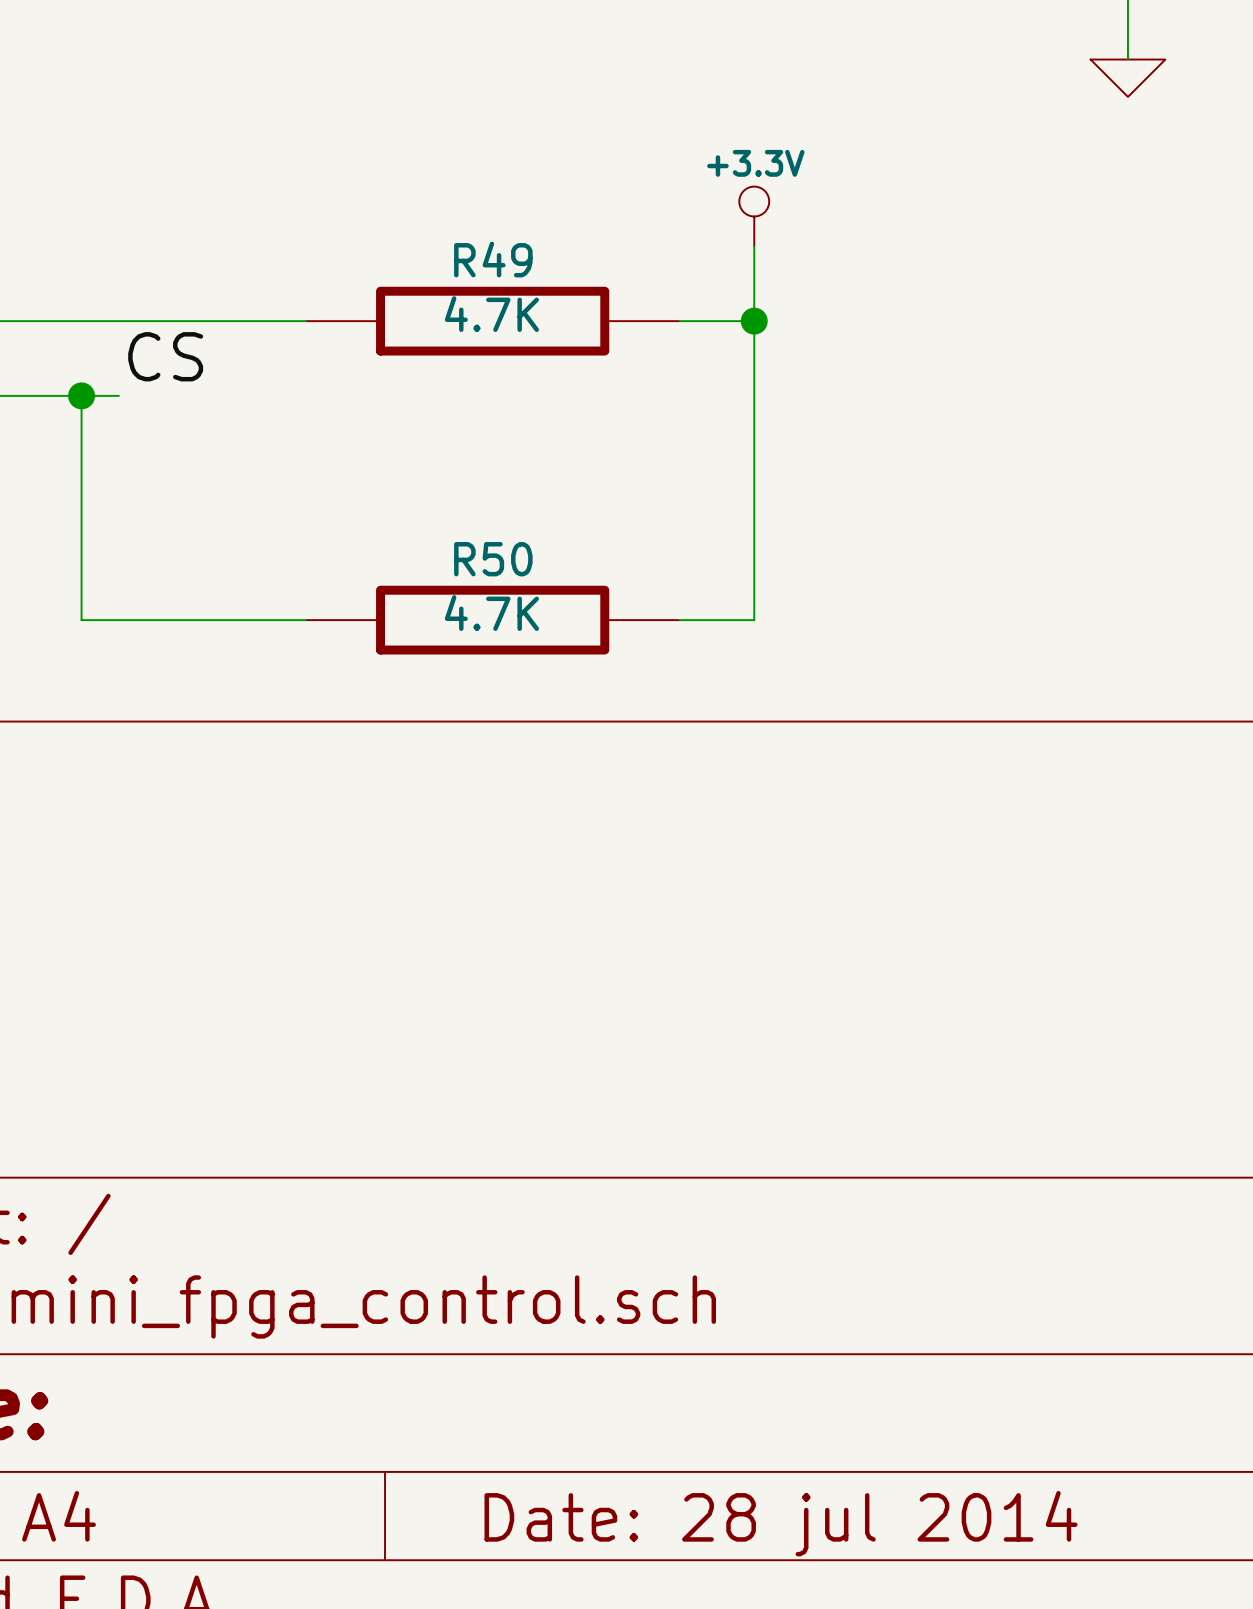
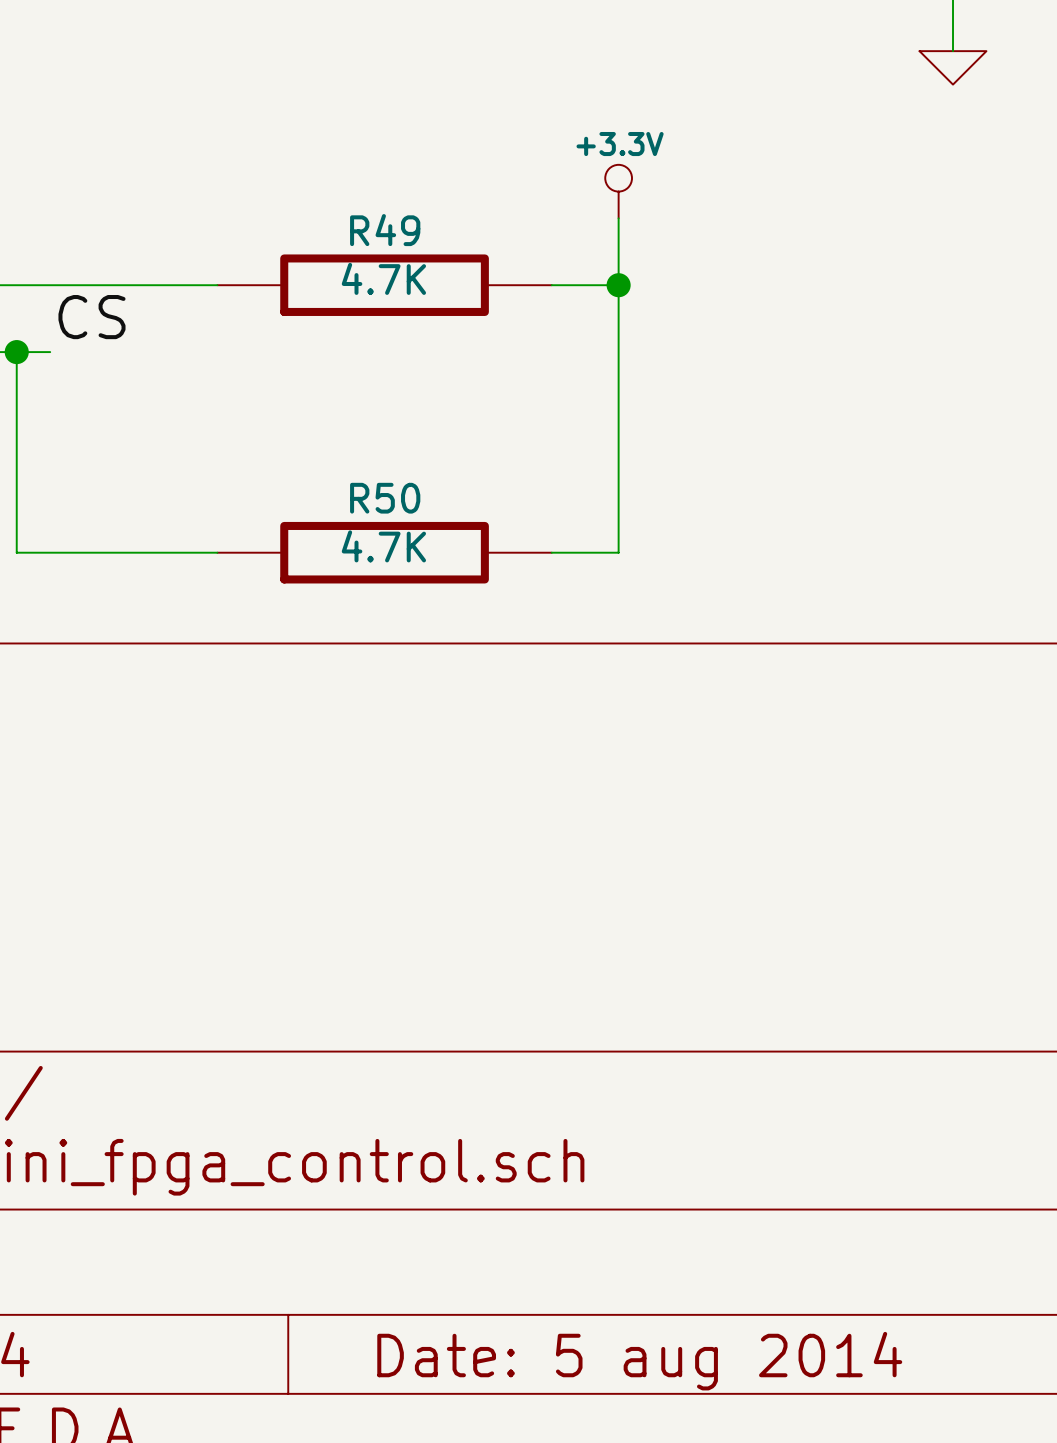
title block: Date: 28 jul 2014 (781, 1523) -> Date: 5 aug 2014 (639, 1361)

